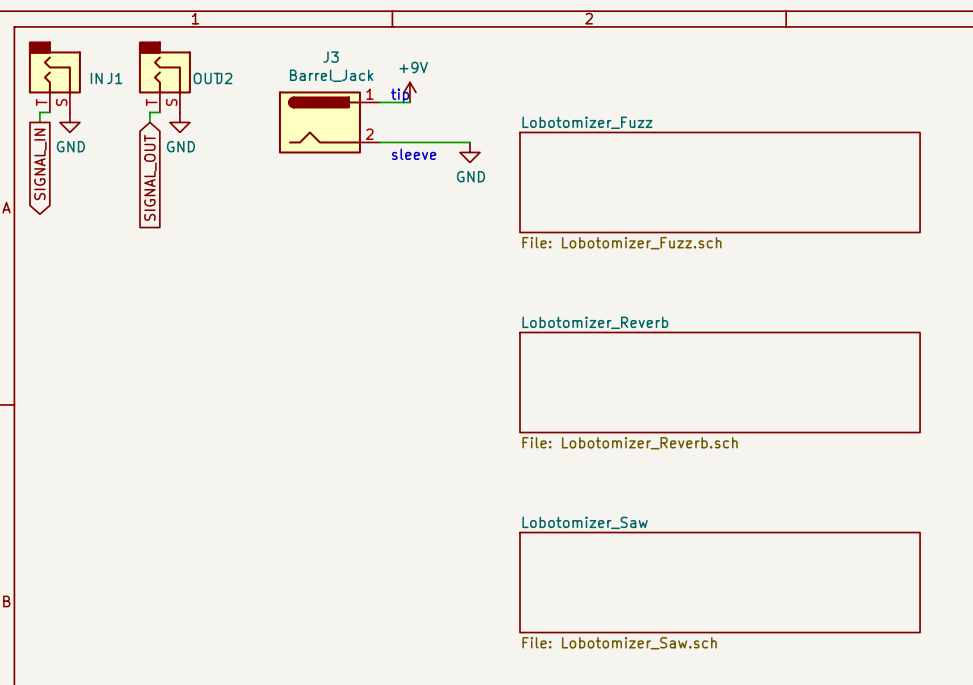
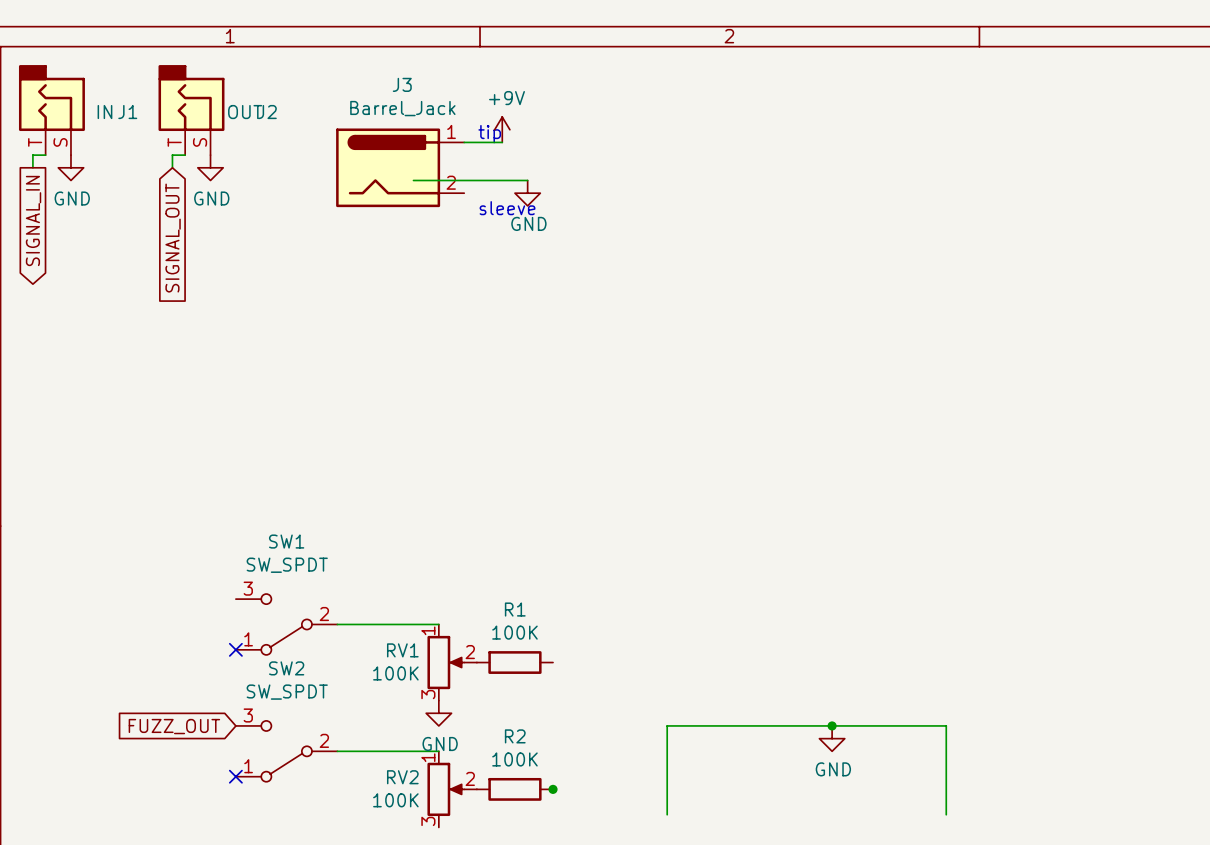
wire: (379, 142) (469, 142) -> (413, 180) (527, 180)
power symbol position: GND (469, 152) -> GND (527, 193)
sheet Lobotomizer_Fuzz: File: Lobotomizer_Fuzz.sch (720, 182) -> none
sheet Lobotomizer_Reverb: File: Lobotomizer_Reverb.sch (720, 382) -> none
SW1: none -> SW_SPDT (286, 624)
wire: none -> (337, 624) (438, 624)
no-connect mark: none -> (235, 649)
RV1: none -> 100K (452, 662)
R1: none -> 100K (514, 662)
power symbol: none -> GND (438, 713)
junction: none -> (832, 725)
global label: none -> FUZZ_OUT (174, 726)
power symbol: none -> GND (832, 738)
SW2: none -> SW_SPDT (286, 751)
wire: none -> (337, 751) (438, 751)
sheet Lobotomizer_Saw: File: Lobotomizer_Saw.sch (720, 582) -> none
no-connect mark: none -> (235, 776)
RV2: none -> 100K (452, 789)
R2: none -> 100K (514, 789)
junction: none -> (553, 789)
wire: none -> (667, 814) (667, 725) (946, 725) (946, 814)

